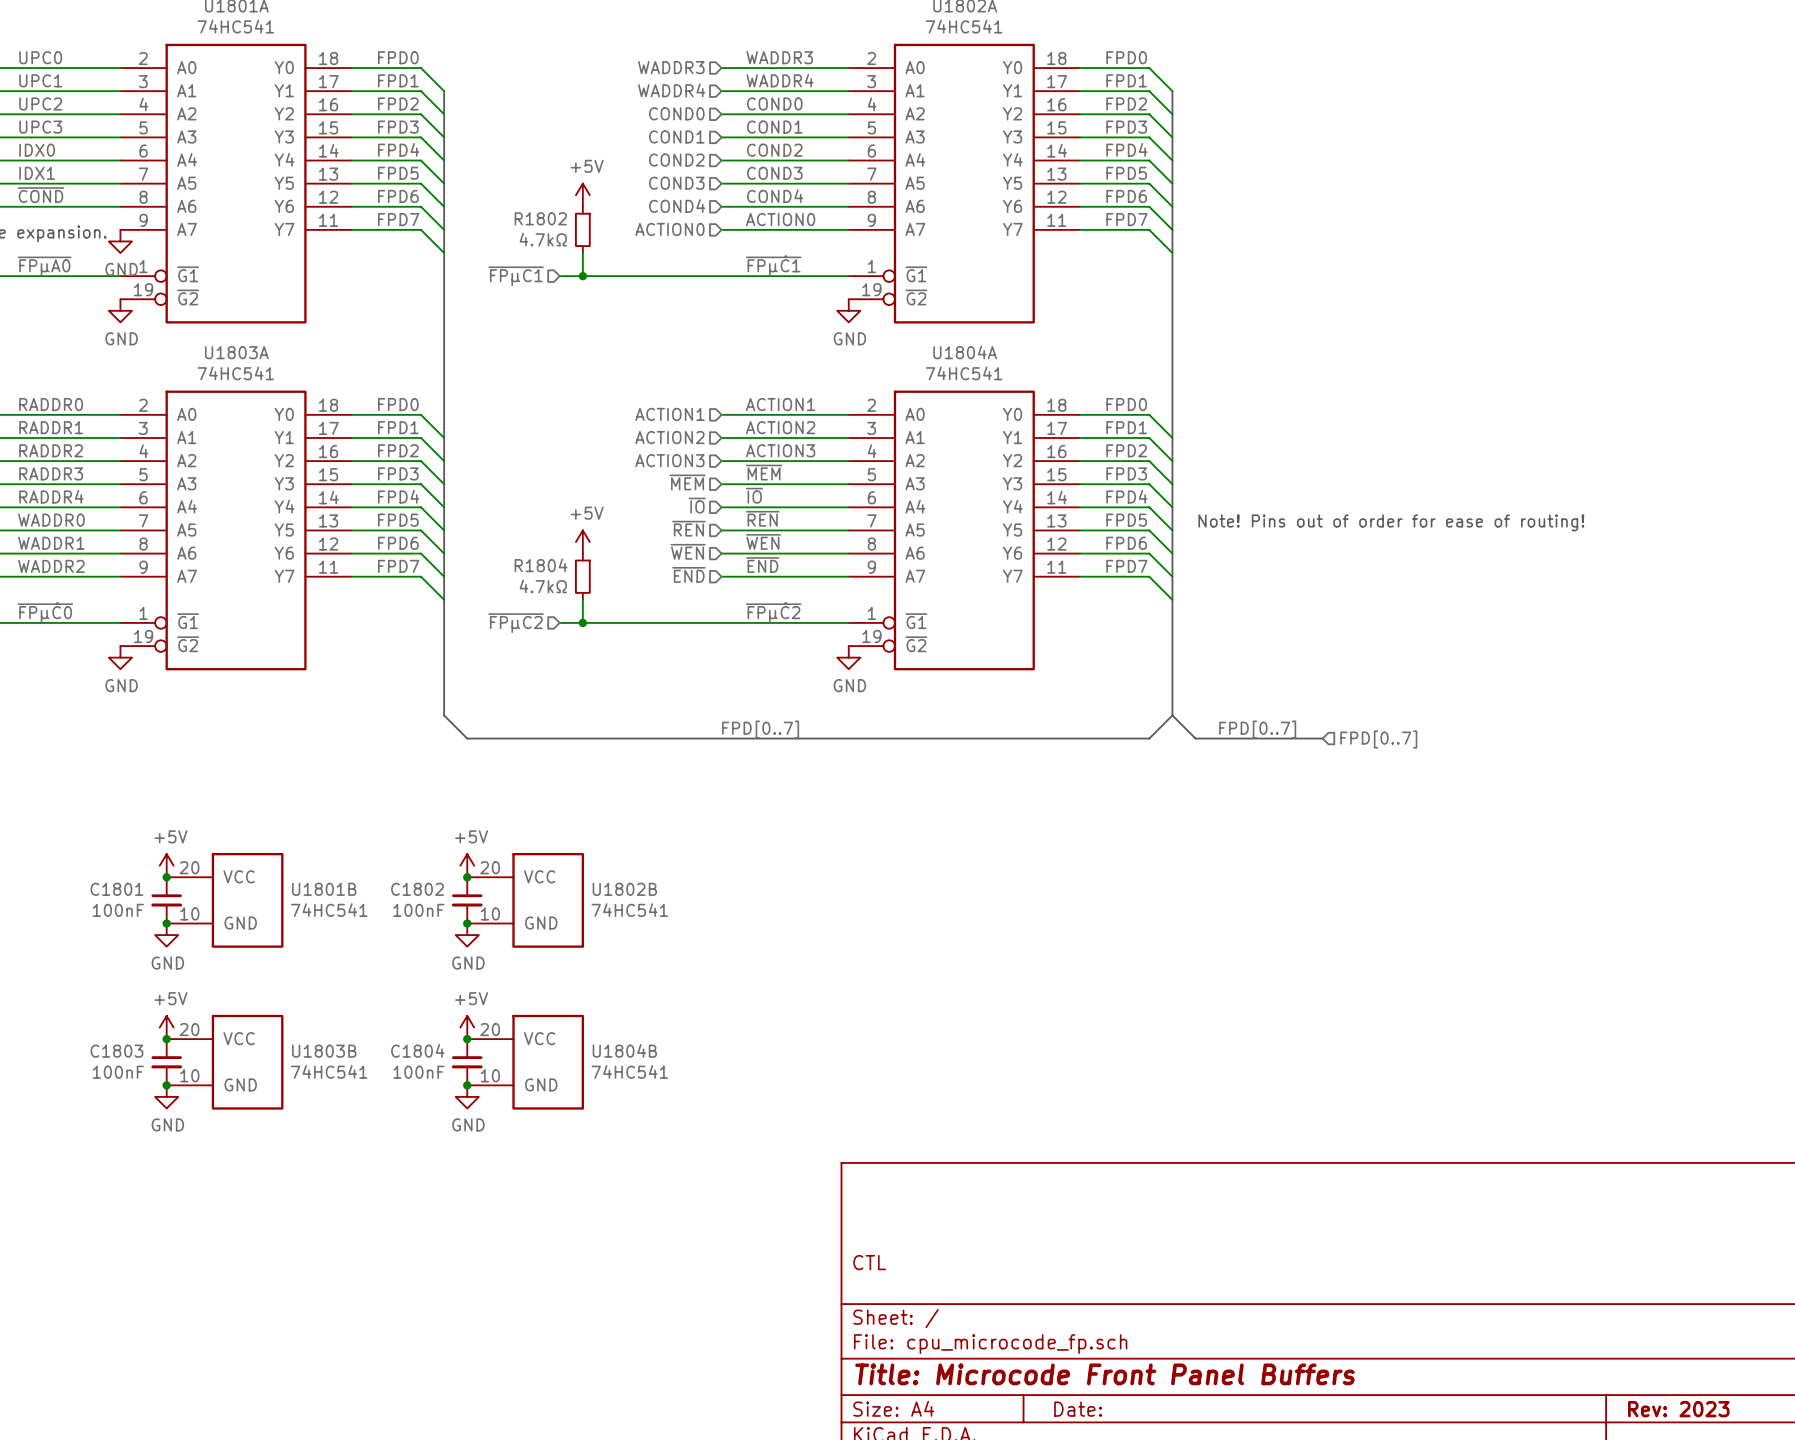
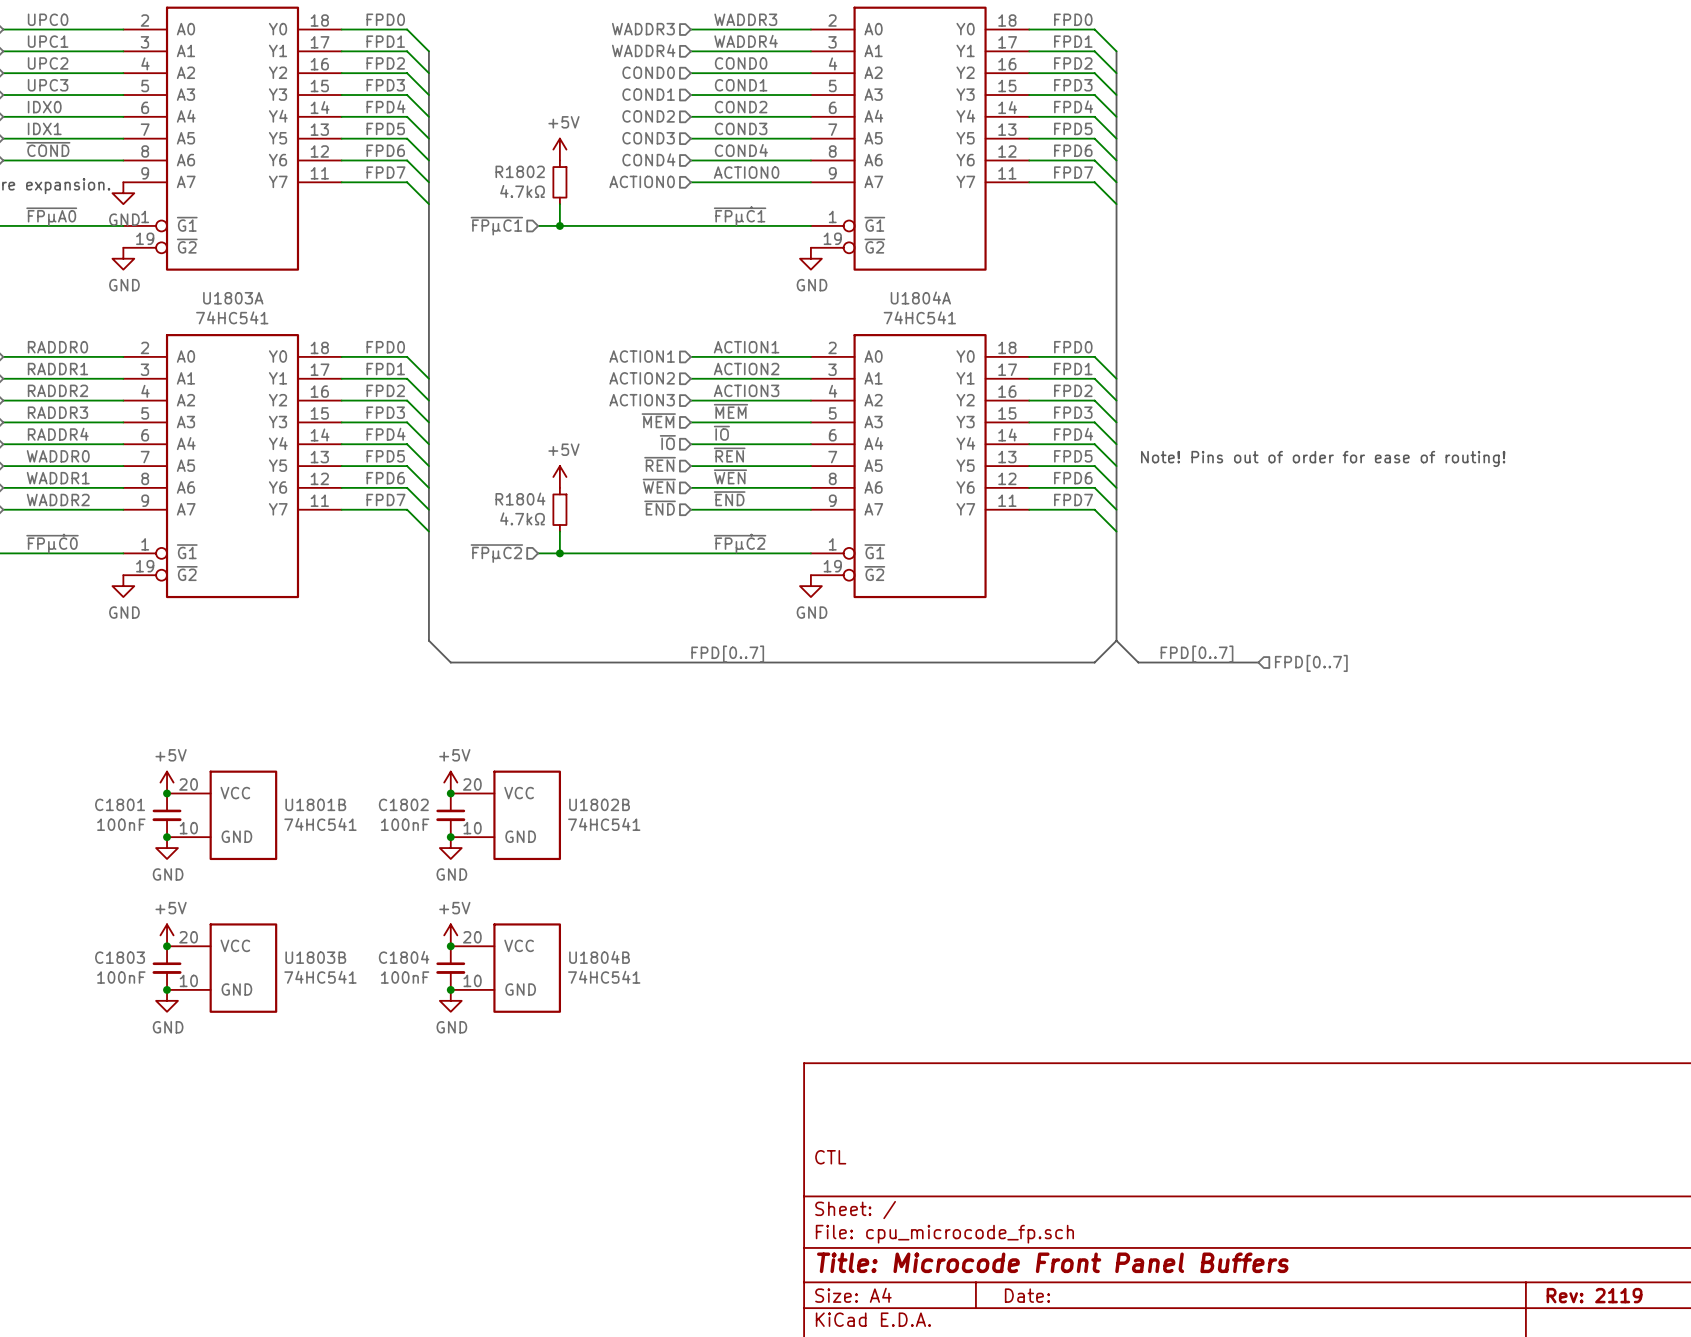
title block: Rev: 2023 (1678, 1409) -> Rev: 2119 (1594, 1295)

